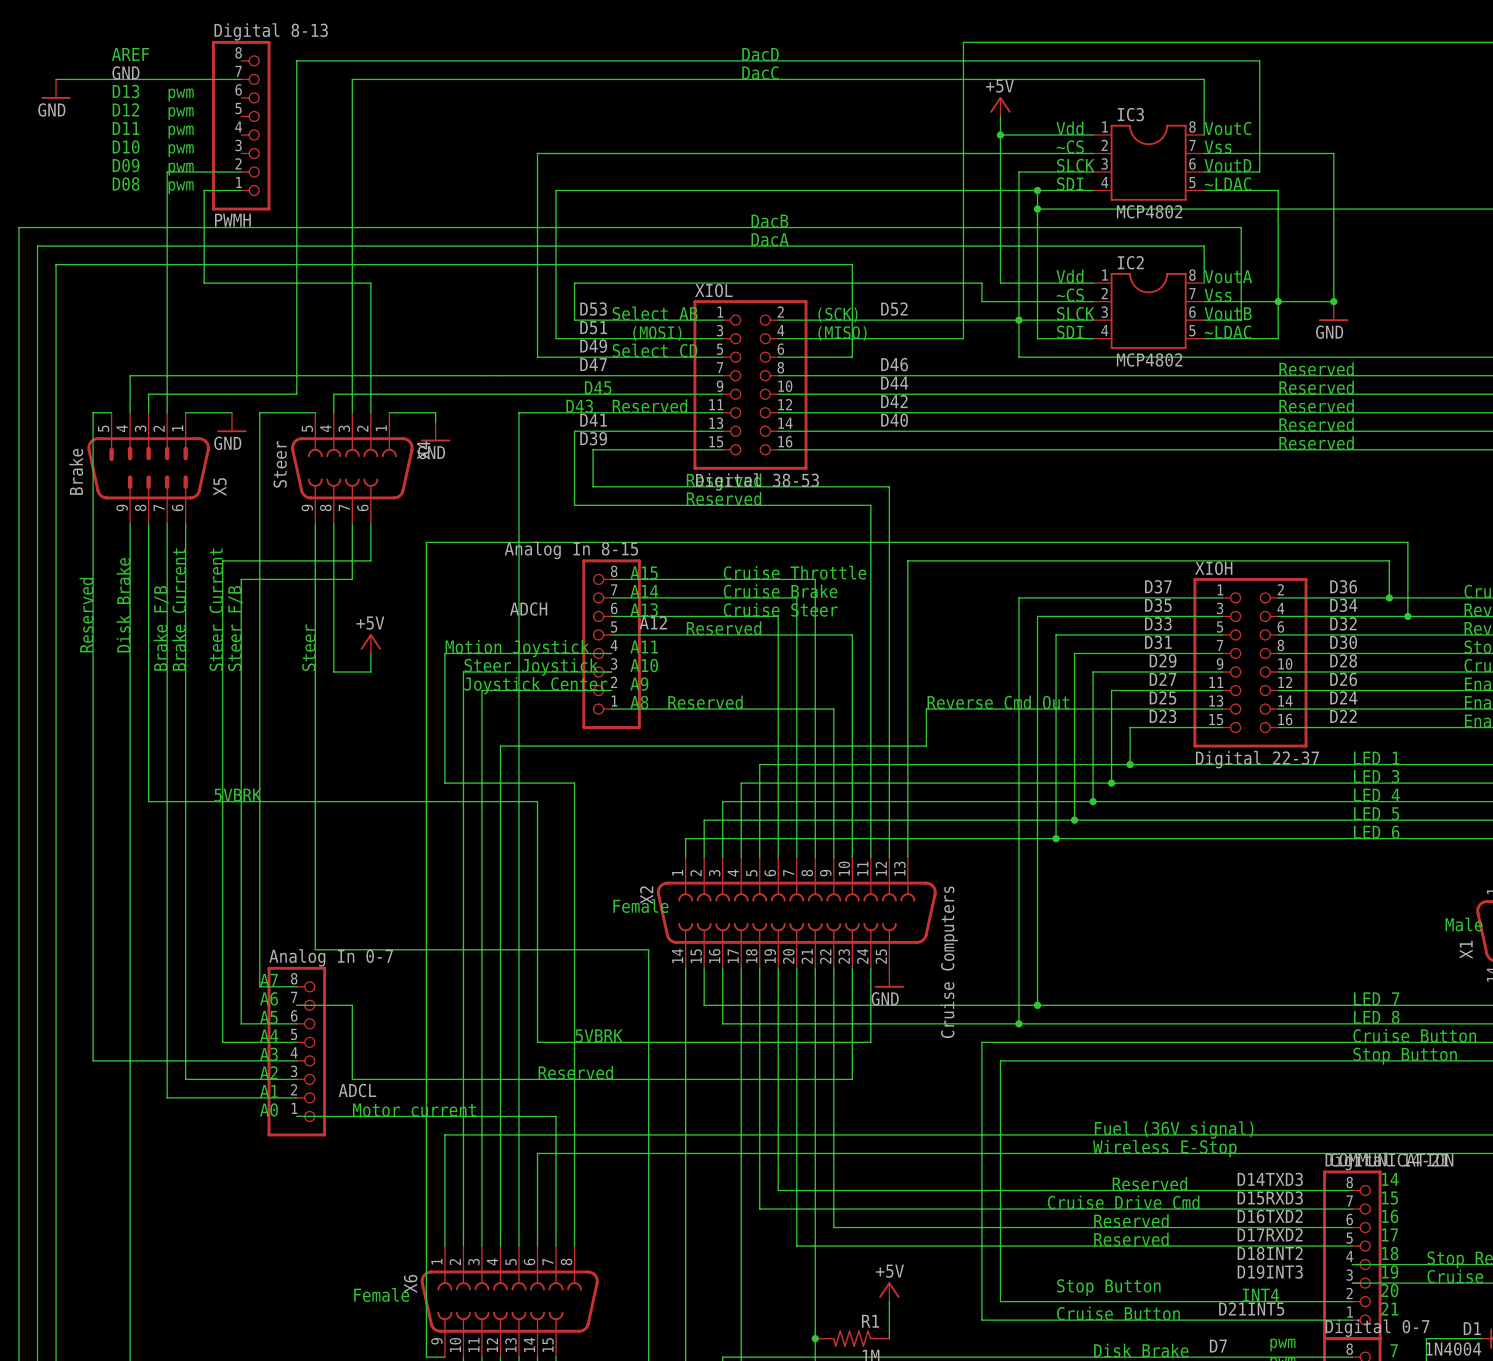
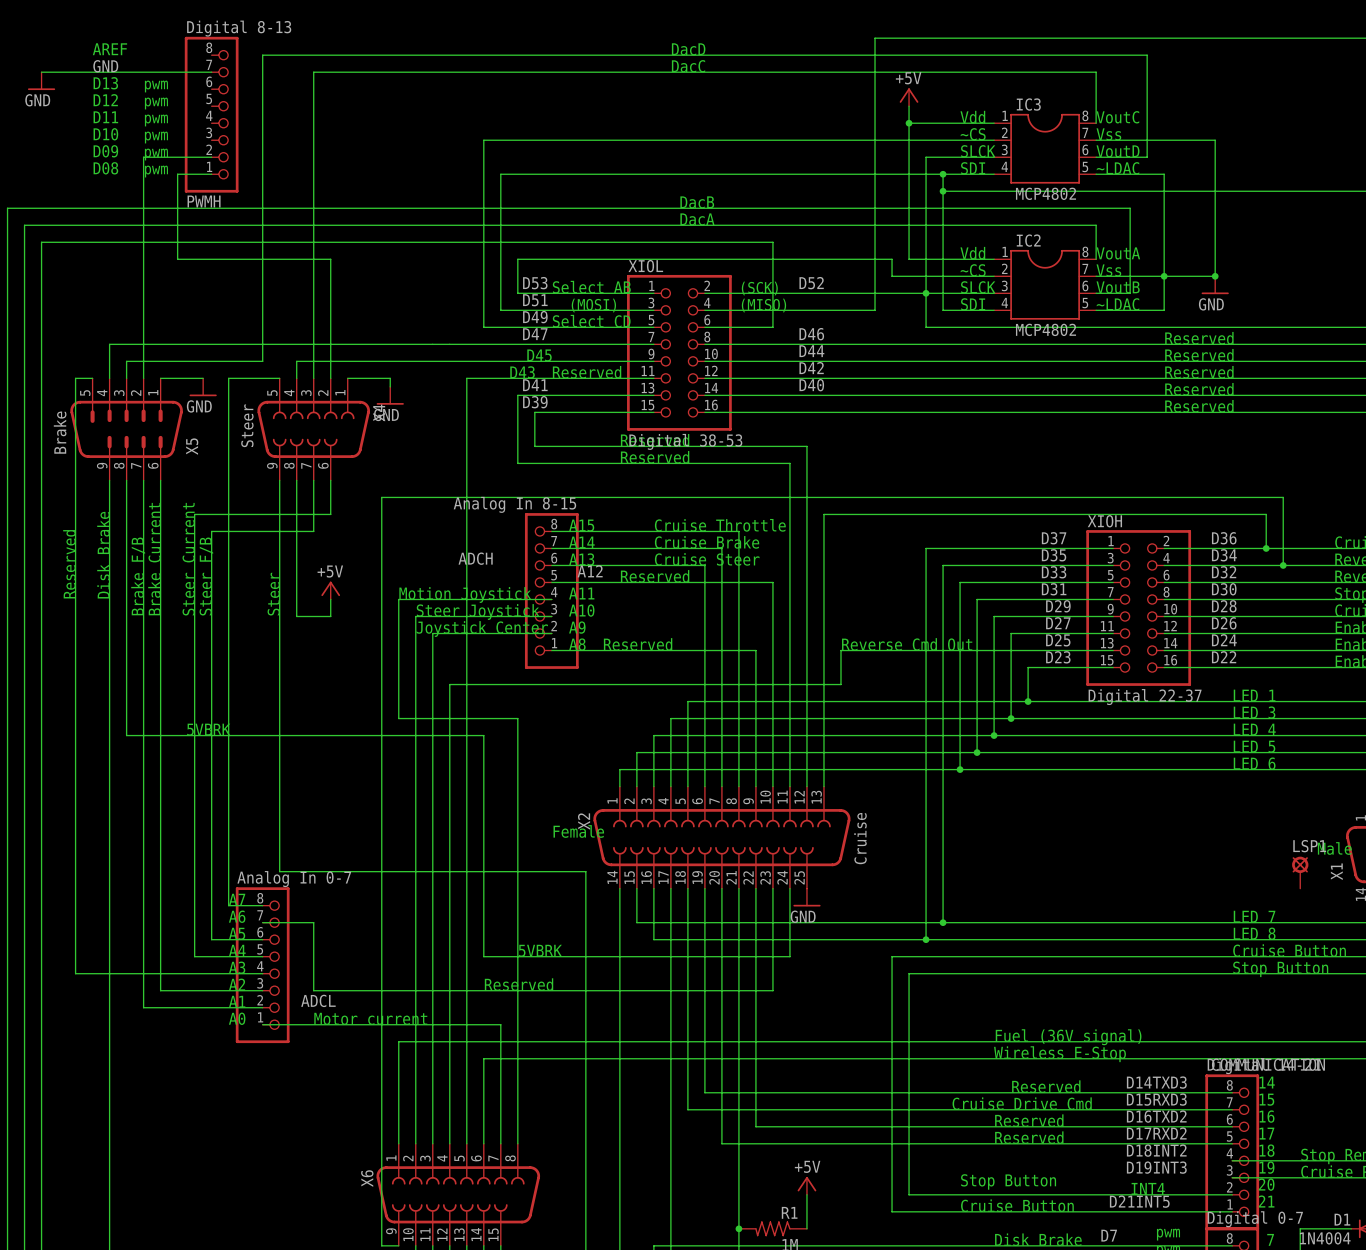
LSP1: none -> (1300, 872)
X2 value: Cruise Computers (949, 962) -> Cruise (860, 838)
text: Female (381, 1294) -> none

